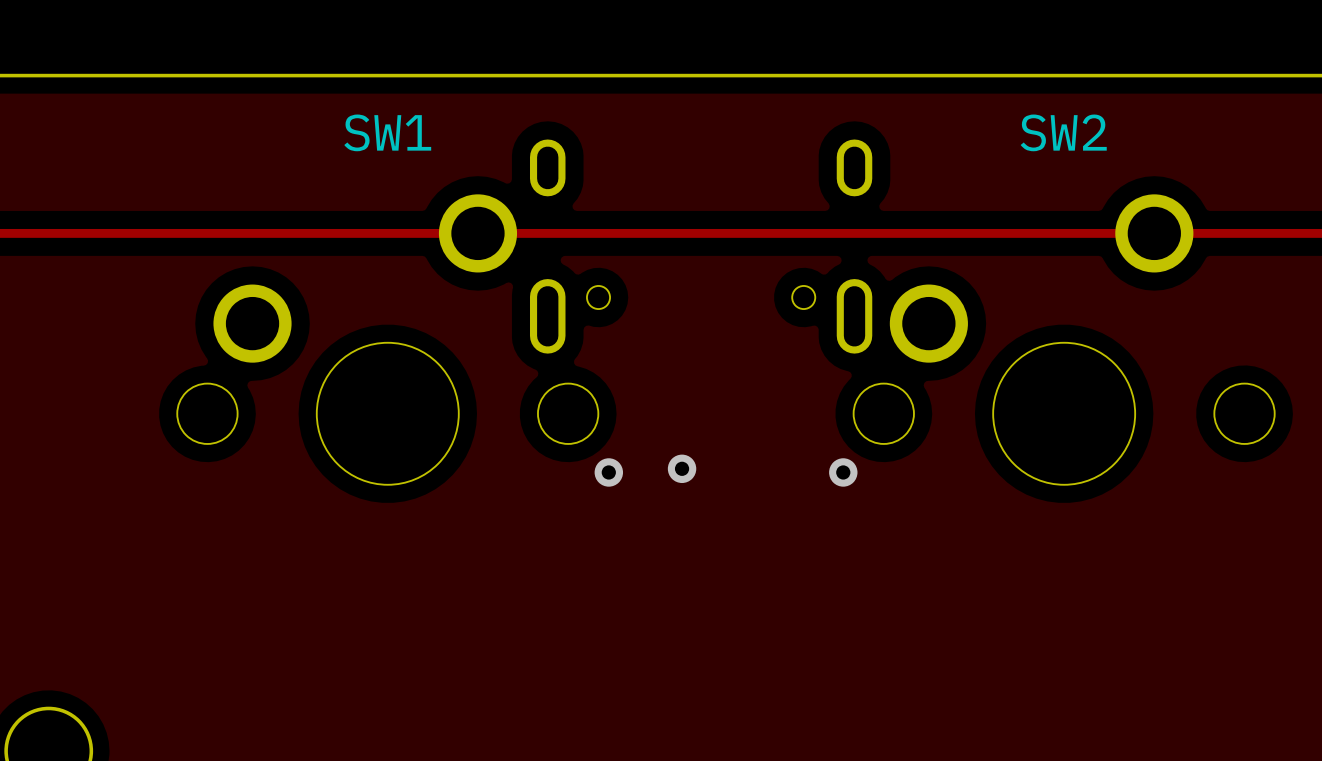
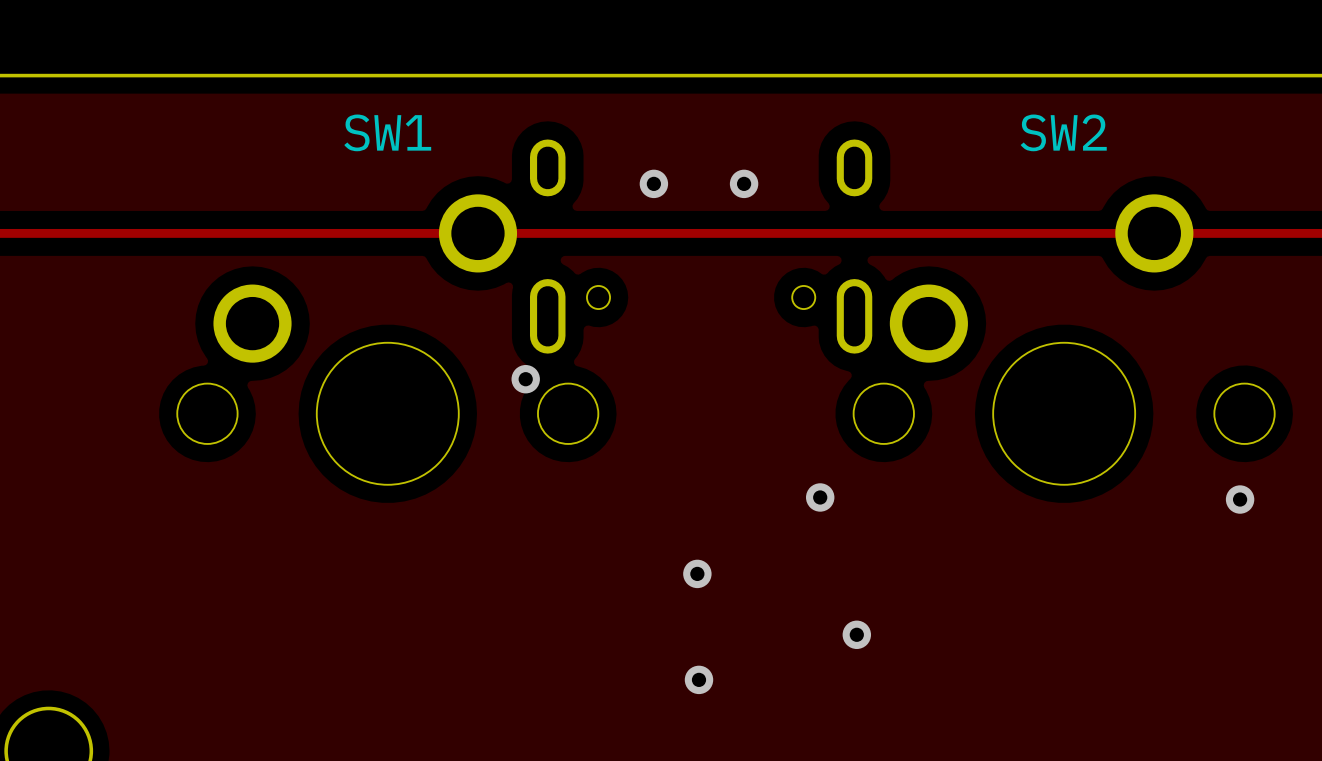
via: none -> (653, 183)
via: none -> (744, 183)
via: none -> (525, 379)
via: (682, 468) -> none
via: (608, 472) -> none
via position: (843, 472) -> (820, 497)
via: none -> (1240, 499)
via: none -> (697, 573)
via: none -> (856, 634)
via: none -> (698, 679)

